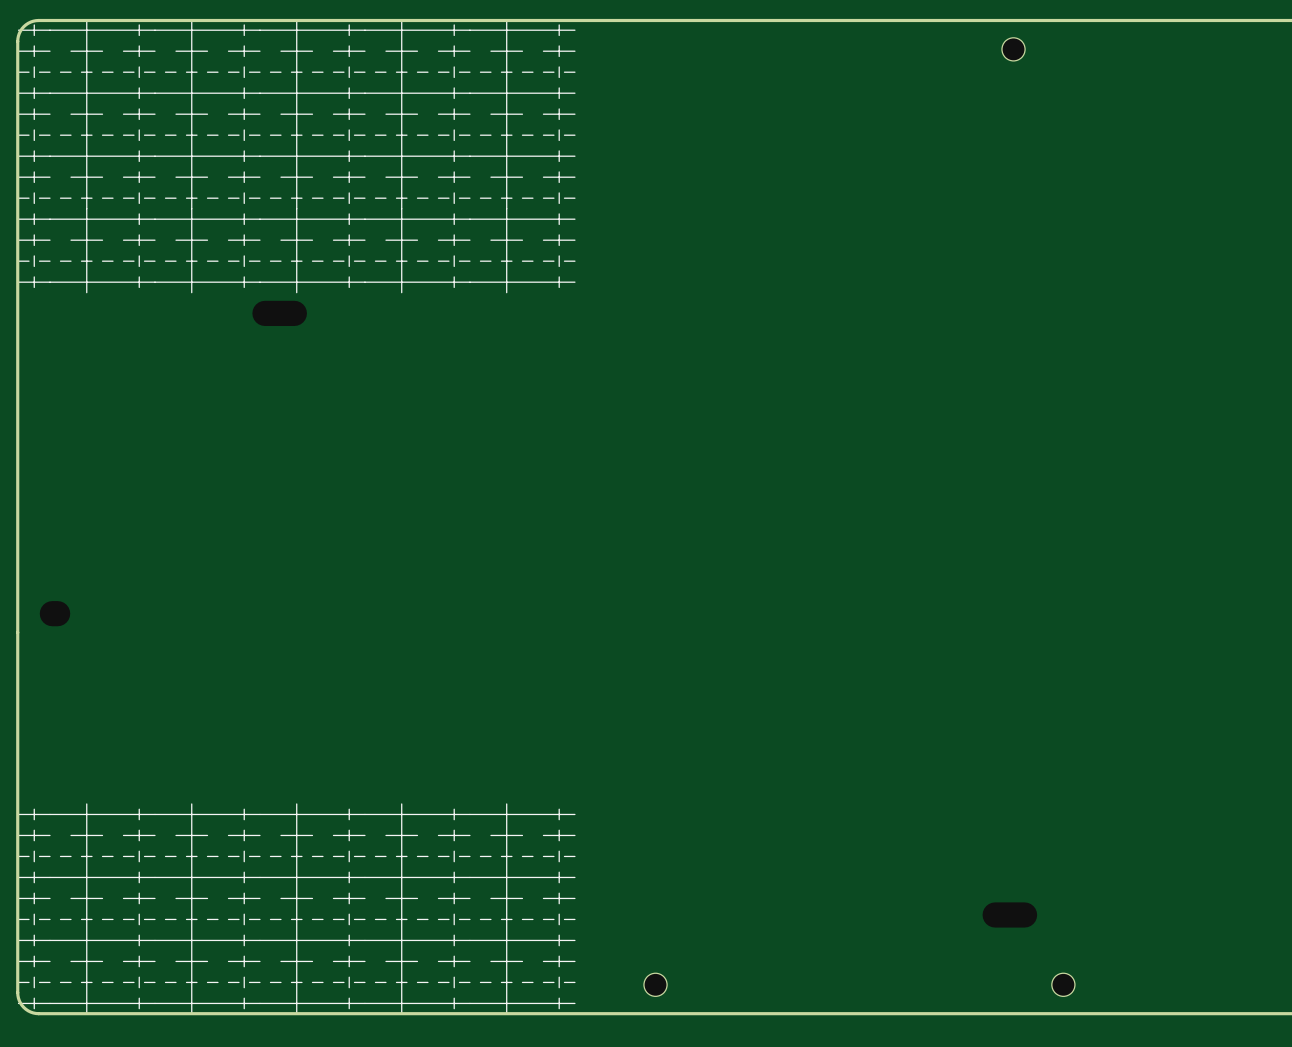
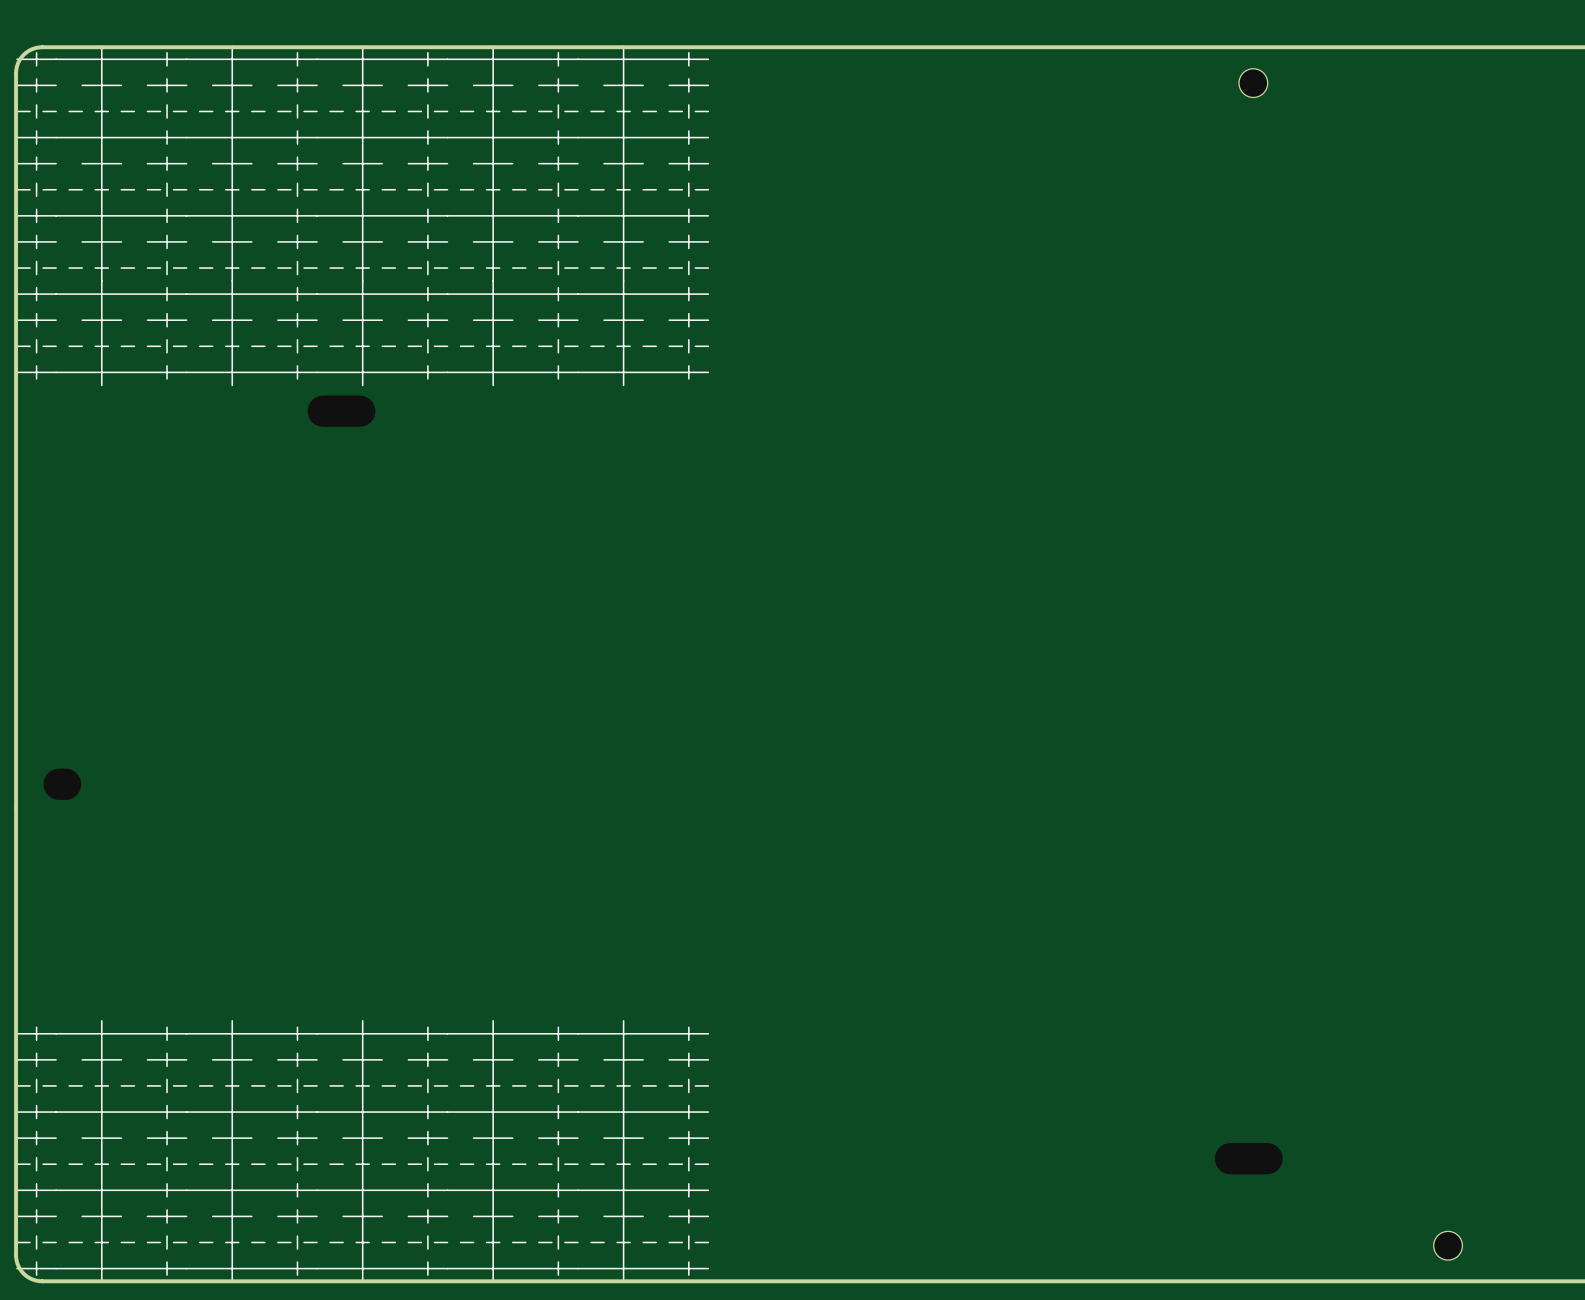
part: (655, 984) -> none
part position: (1063, 984) -> (1448, 1245)

